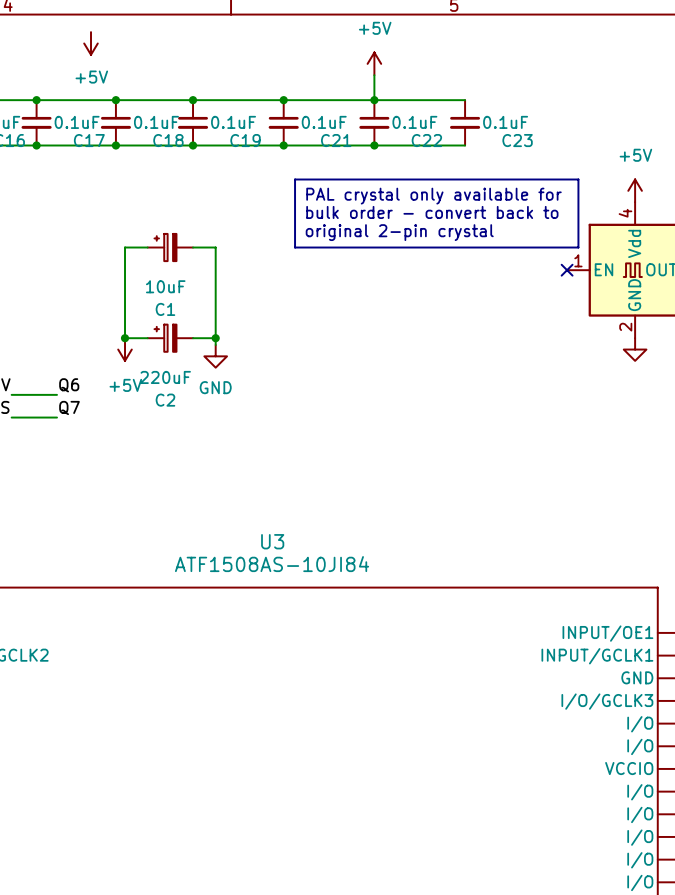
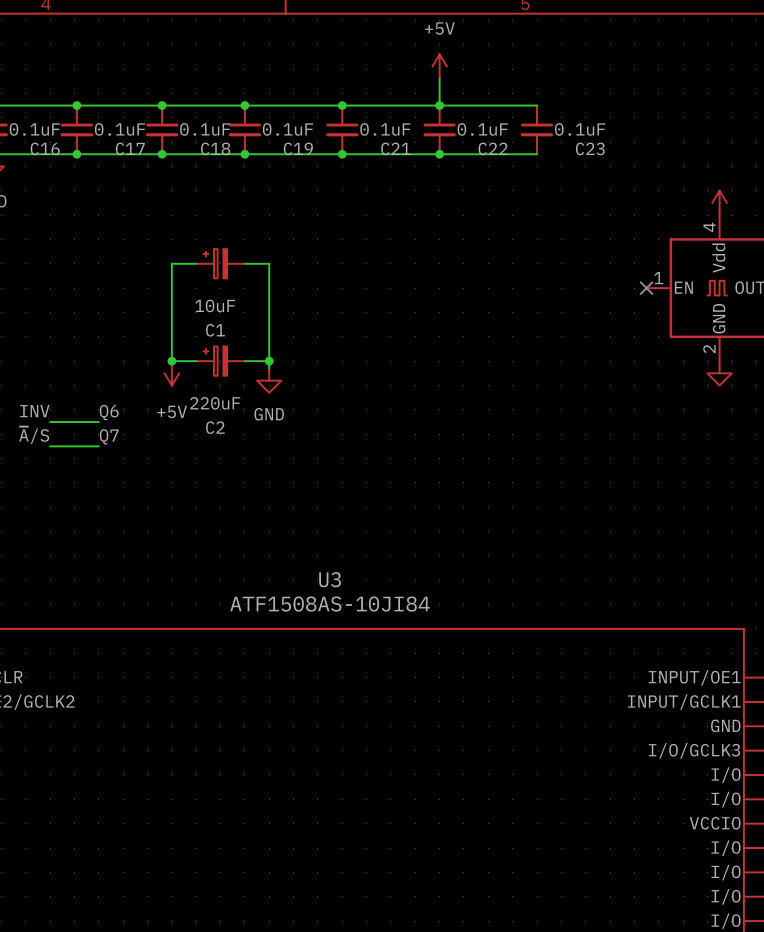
power symbol: +5V (91, 43) -> none
power symbol text: +5V (635, 155) -> none
line: (295, 179) (578, 179) (578, 247) (295, 247) (295, 179) -> none
text: PAL crystal only available for (433, 196) -> none
text: bulk order - convert back to (432, 212) -> none
text: original 2-pin crystal (399, 232) -> none

